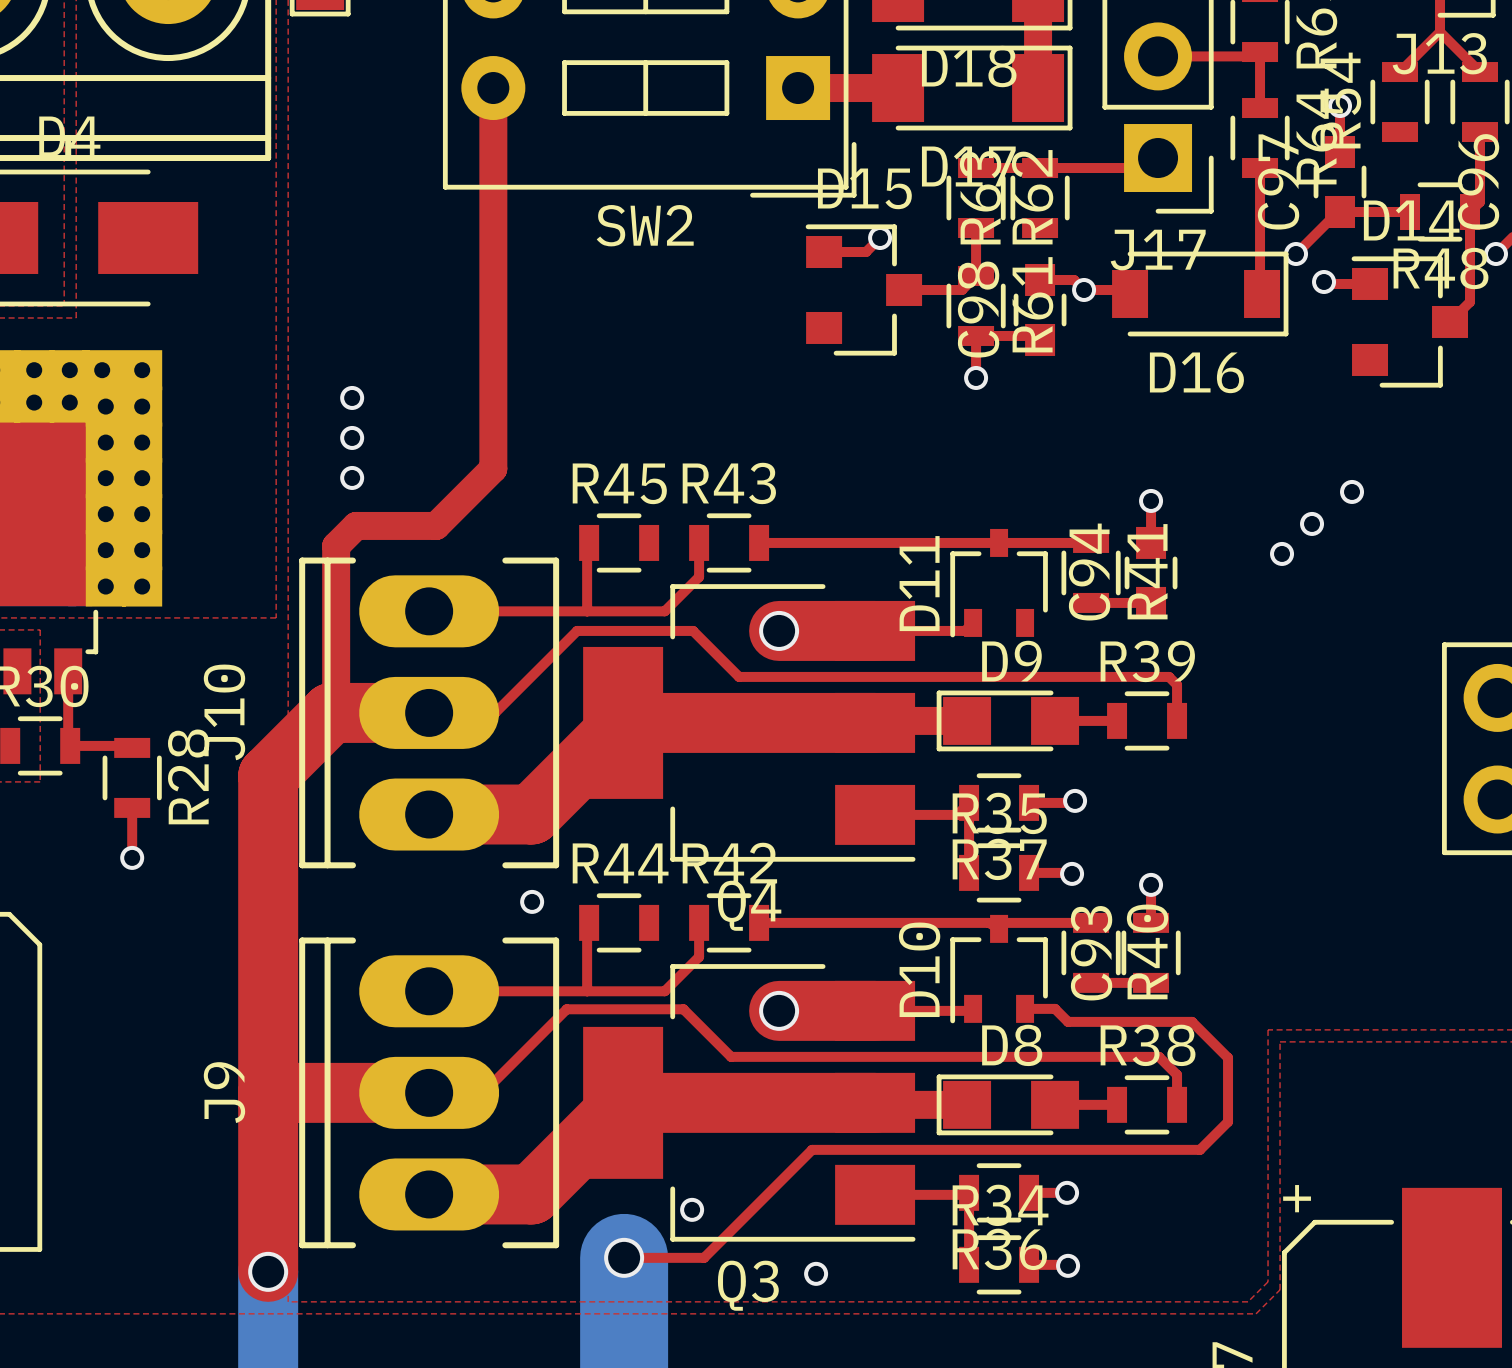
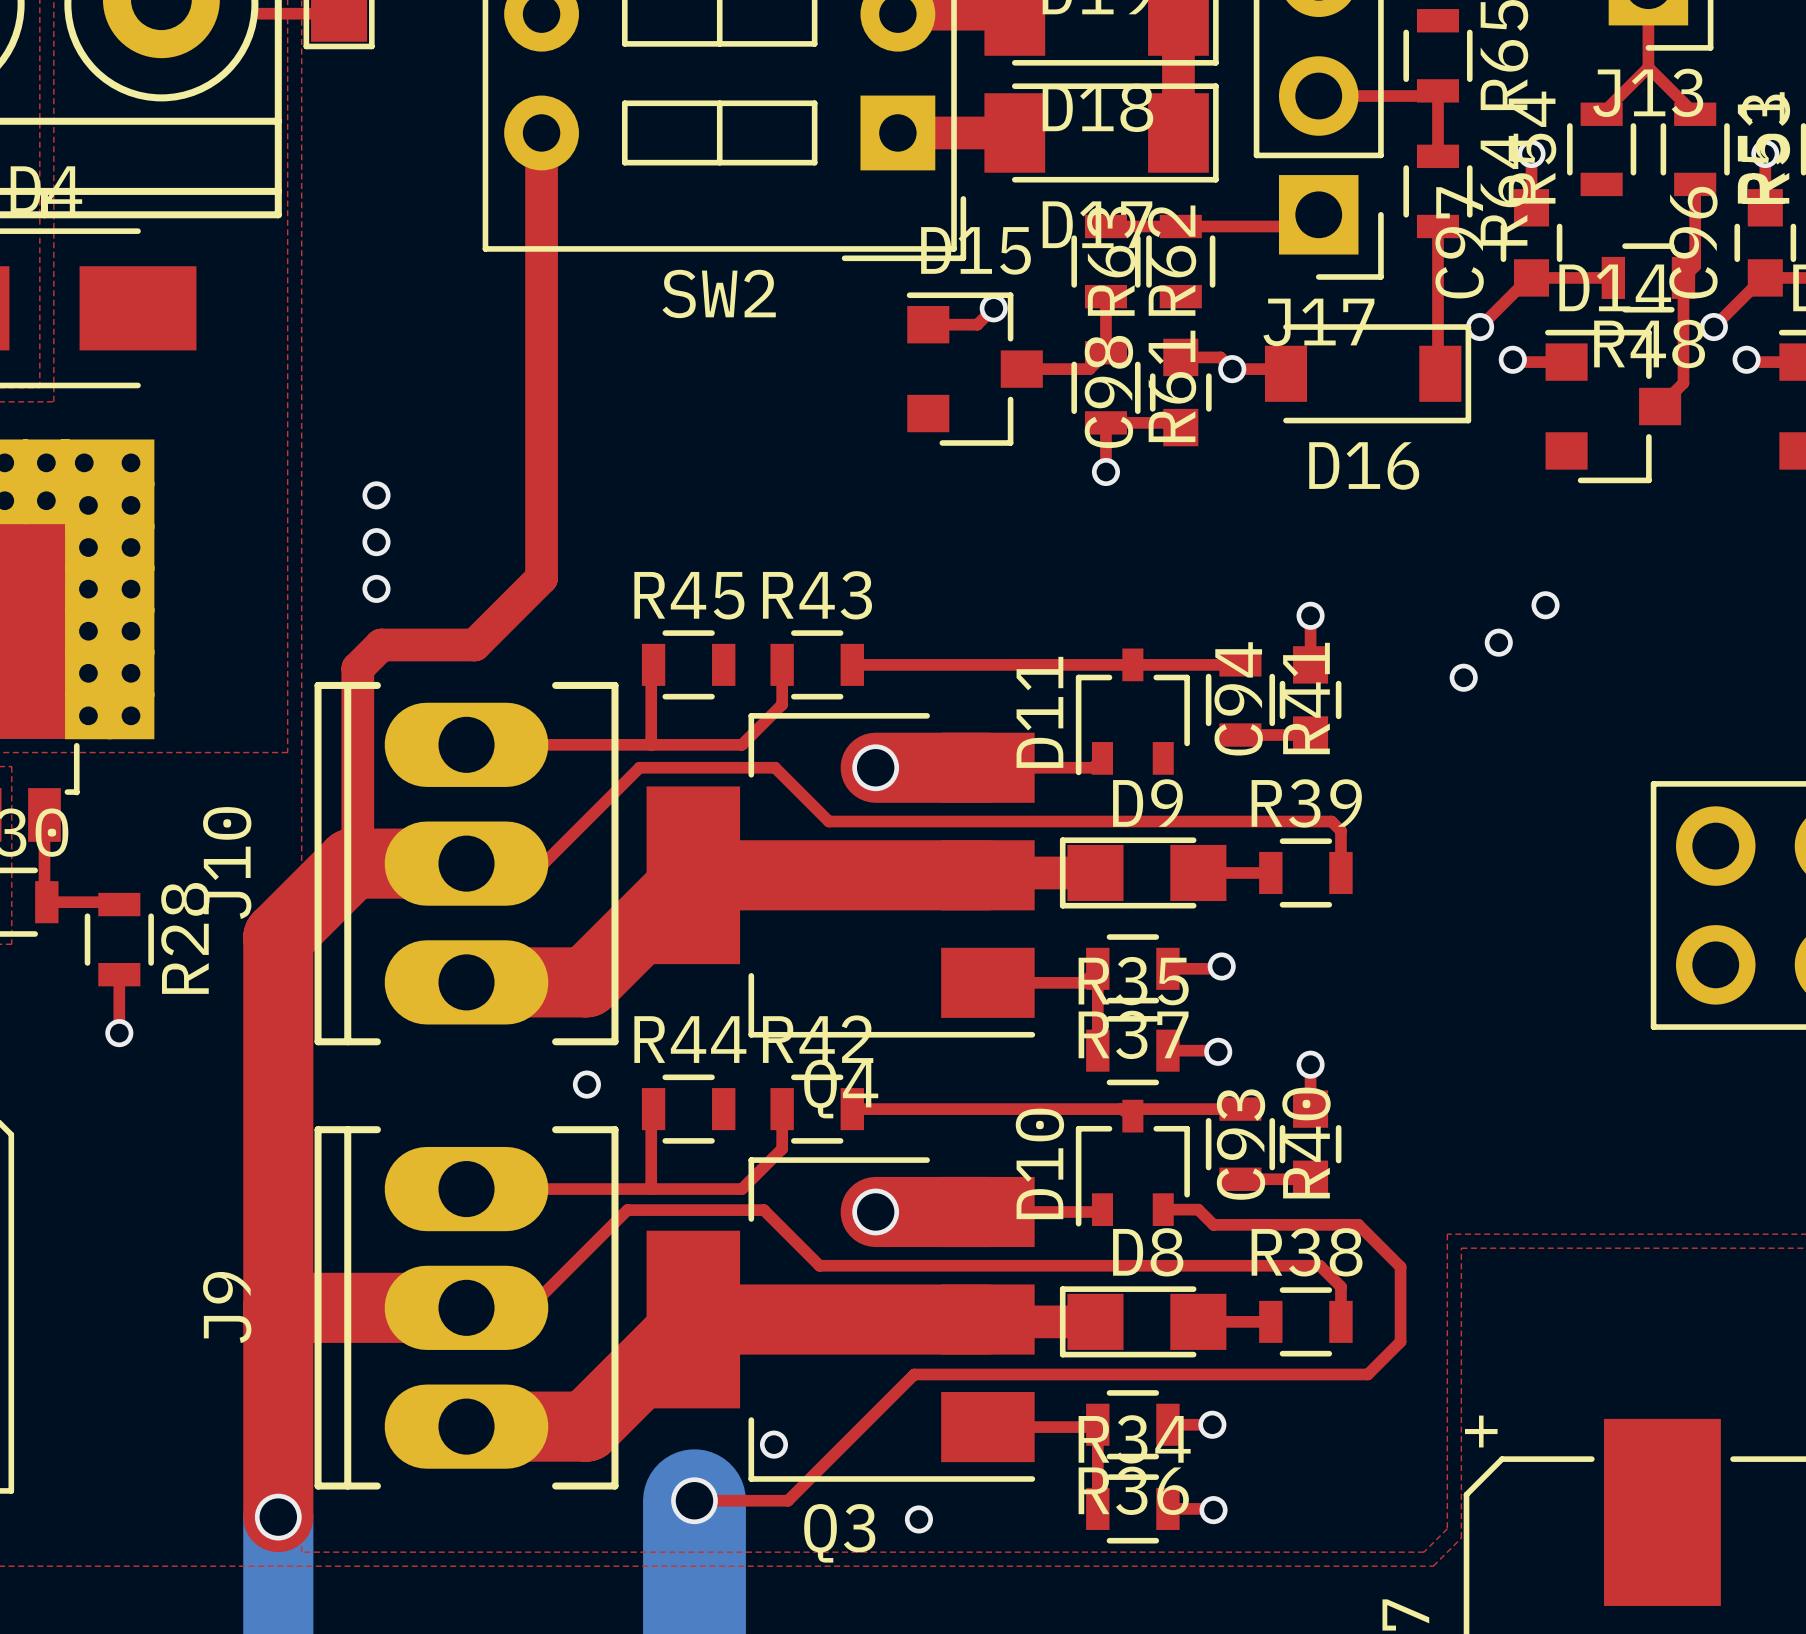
C93 footprint: [1121, 912, 1181, 993] -> [1279, 1090, 1342, 1198]

